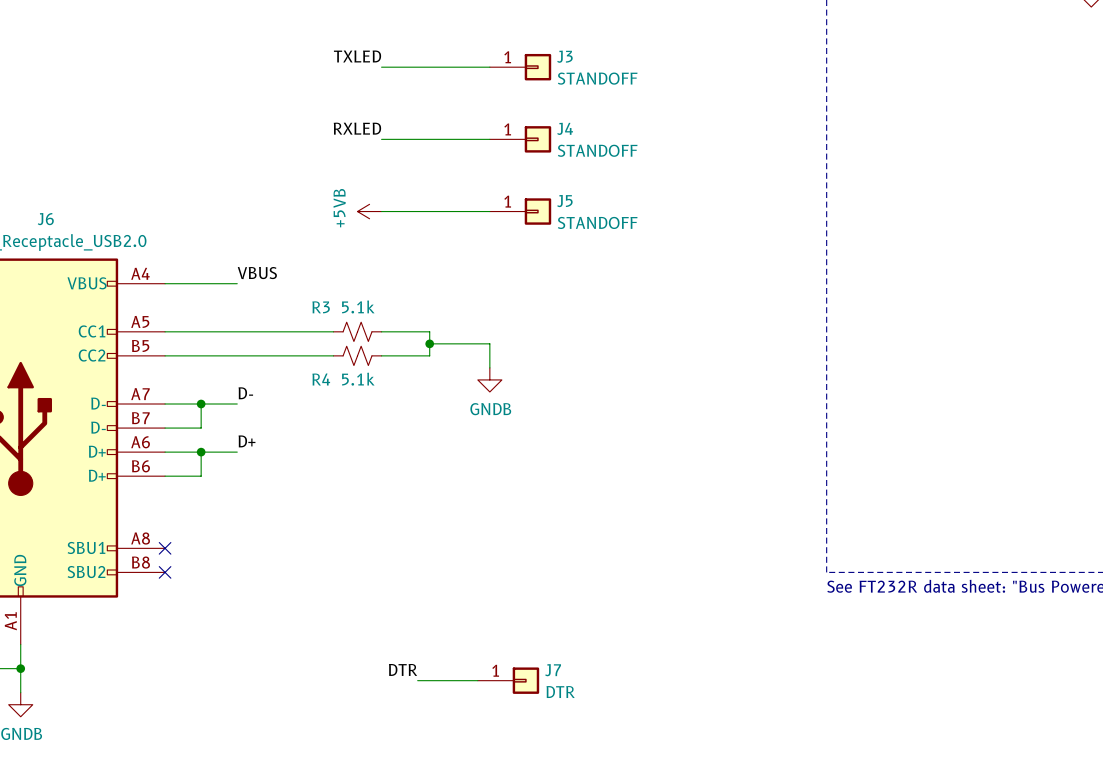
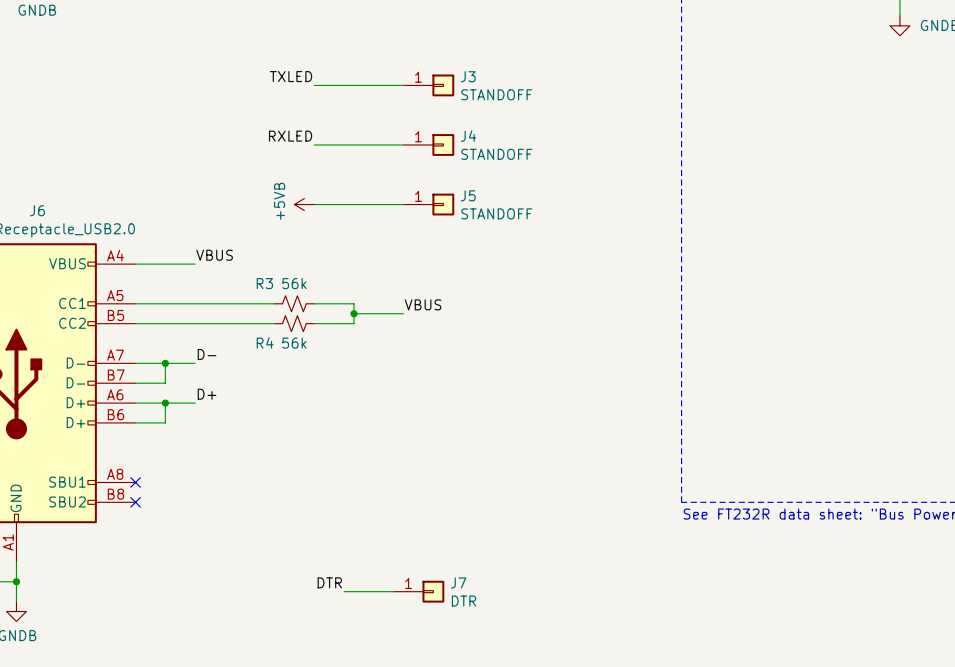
R3 value: 5.1k (358, 306) -> 56k (294, 283)
label: none -> VBUS (423, 304)
wire: (489, 343) (489, 367) -> none
R4 value: 5.1k (358, 379) -> 56k (294, 343)
power symbol: GNDB (489, 379) -> none

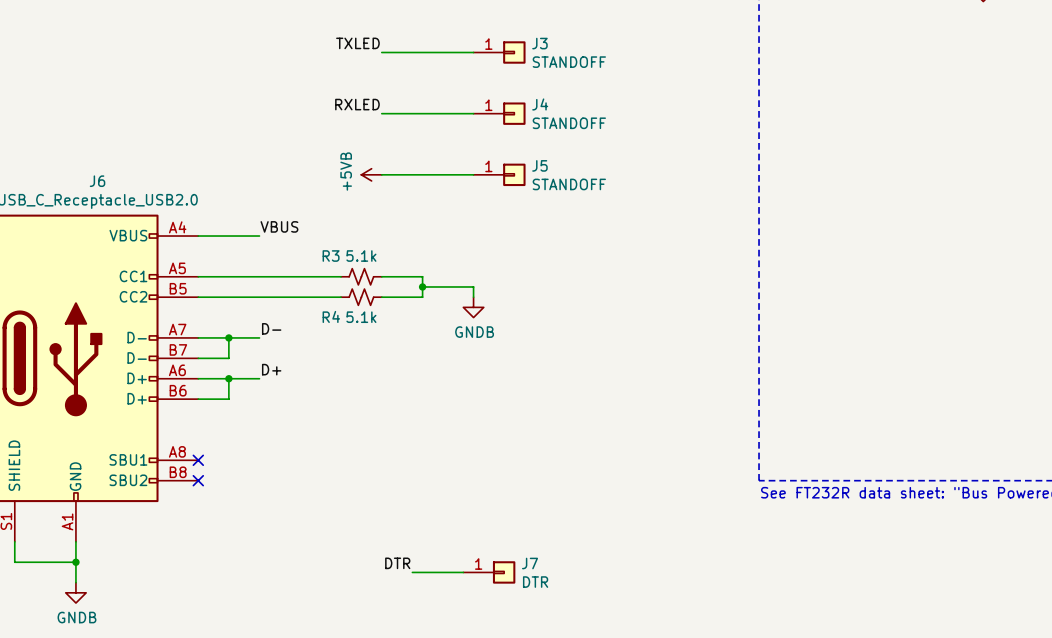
R3 value: 56k (294, 283) -> 5.1k (361, 256)
label: VBUS (423, 304) -> none
wire: none -> (473, 286) (473, 297)
power symbol: none -> GNDB (473, 307)
R4 value: 56k (294, 343) -> 5.1k (361, 317)

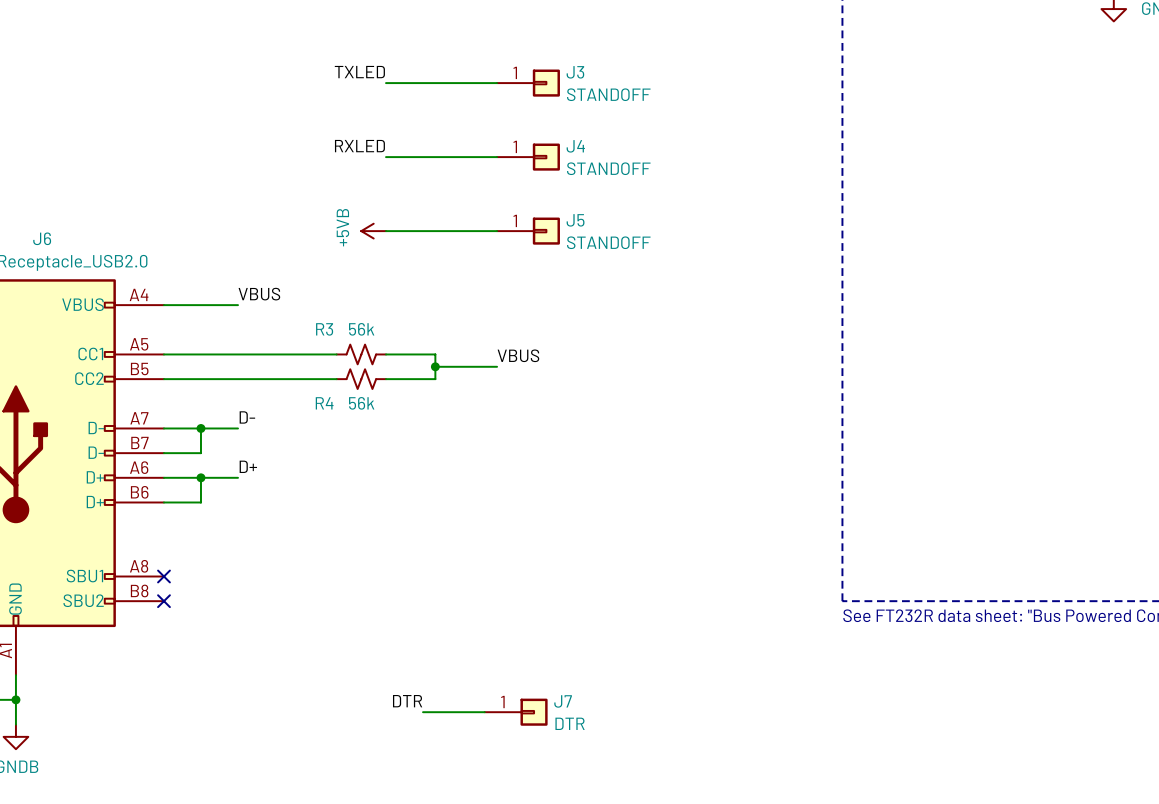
R3 value: 5.1k (361, 256) -> 56k (361, 329)
label: none -> VBUS (518, 355)
wire: (473, 286) (473, 297) -> none
power symbol: GNDB (473, 307) -> none
R4 value: 5.1k (361, 317) -> 56k (361, 403)

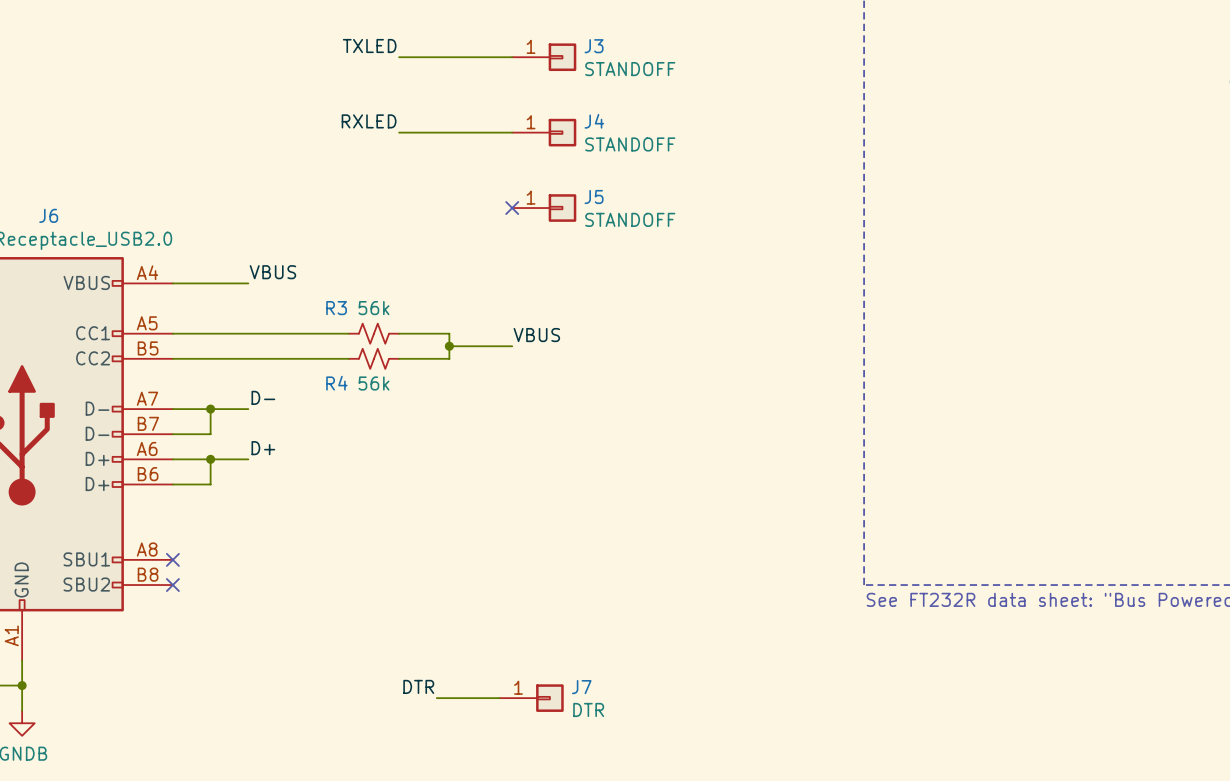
power symbol: +5VB (373, 231) -> none
wire: (386, 231) (497, 231) -> none
no-connect mark: none -> (512, 208)

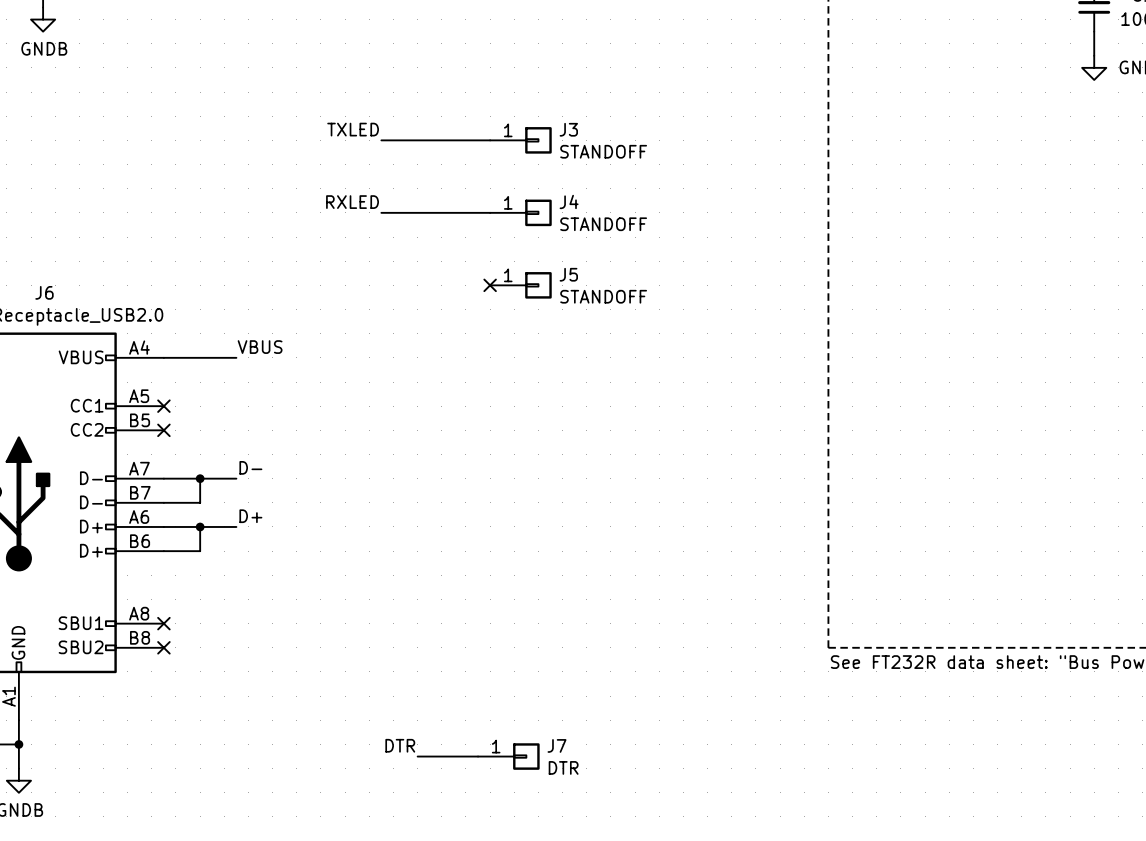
wire: (172, 333) (348, 333) -> none
no-connect mark: none -> (163, 406)
R3: 56k (373, 333) -> none
wire: (399, 333) (449, 333) (449, 358) (399, 358) -> none
label: VBUS (536, 335) -> none
wire: (449, 346) (512, 346) -> none
junction: (449, 346) -> none
wire: (172, 358) (348, 358) -> none
no-connect mark: none -> (163, 430)
R4: 56k (373, 358) -> none

